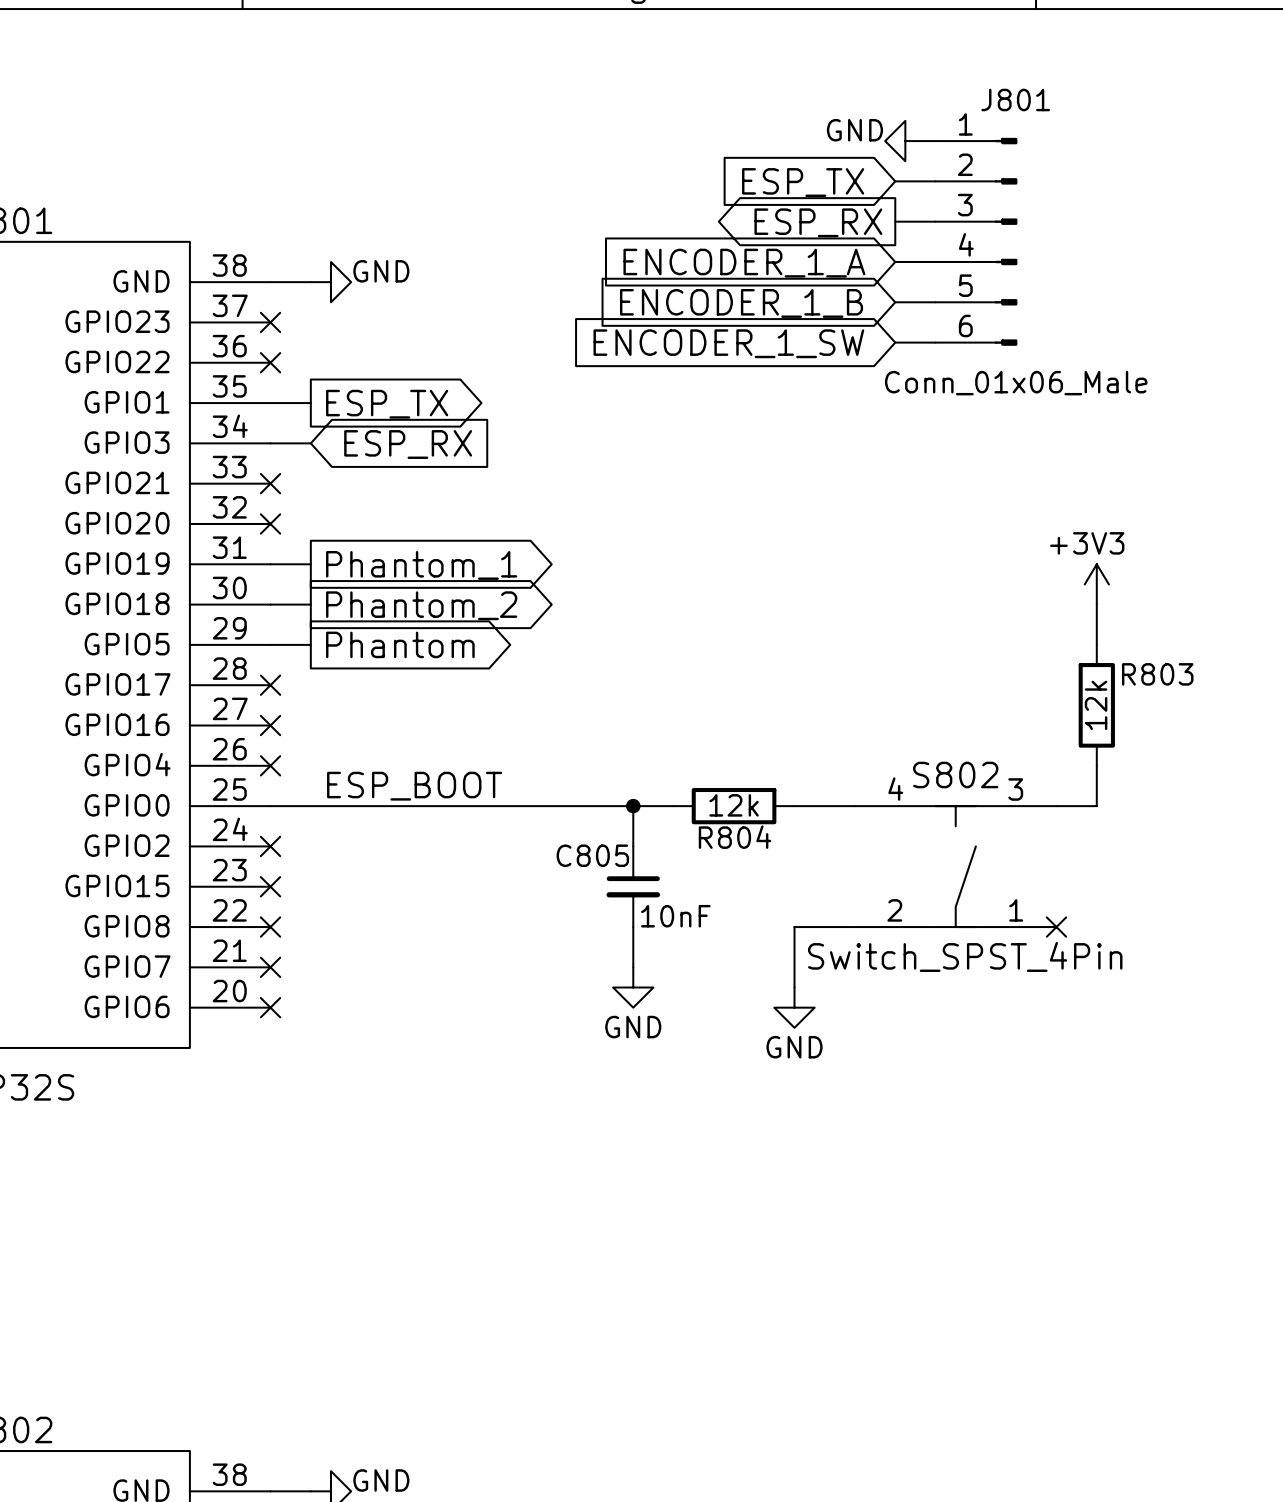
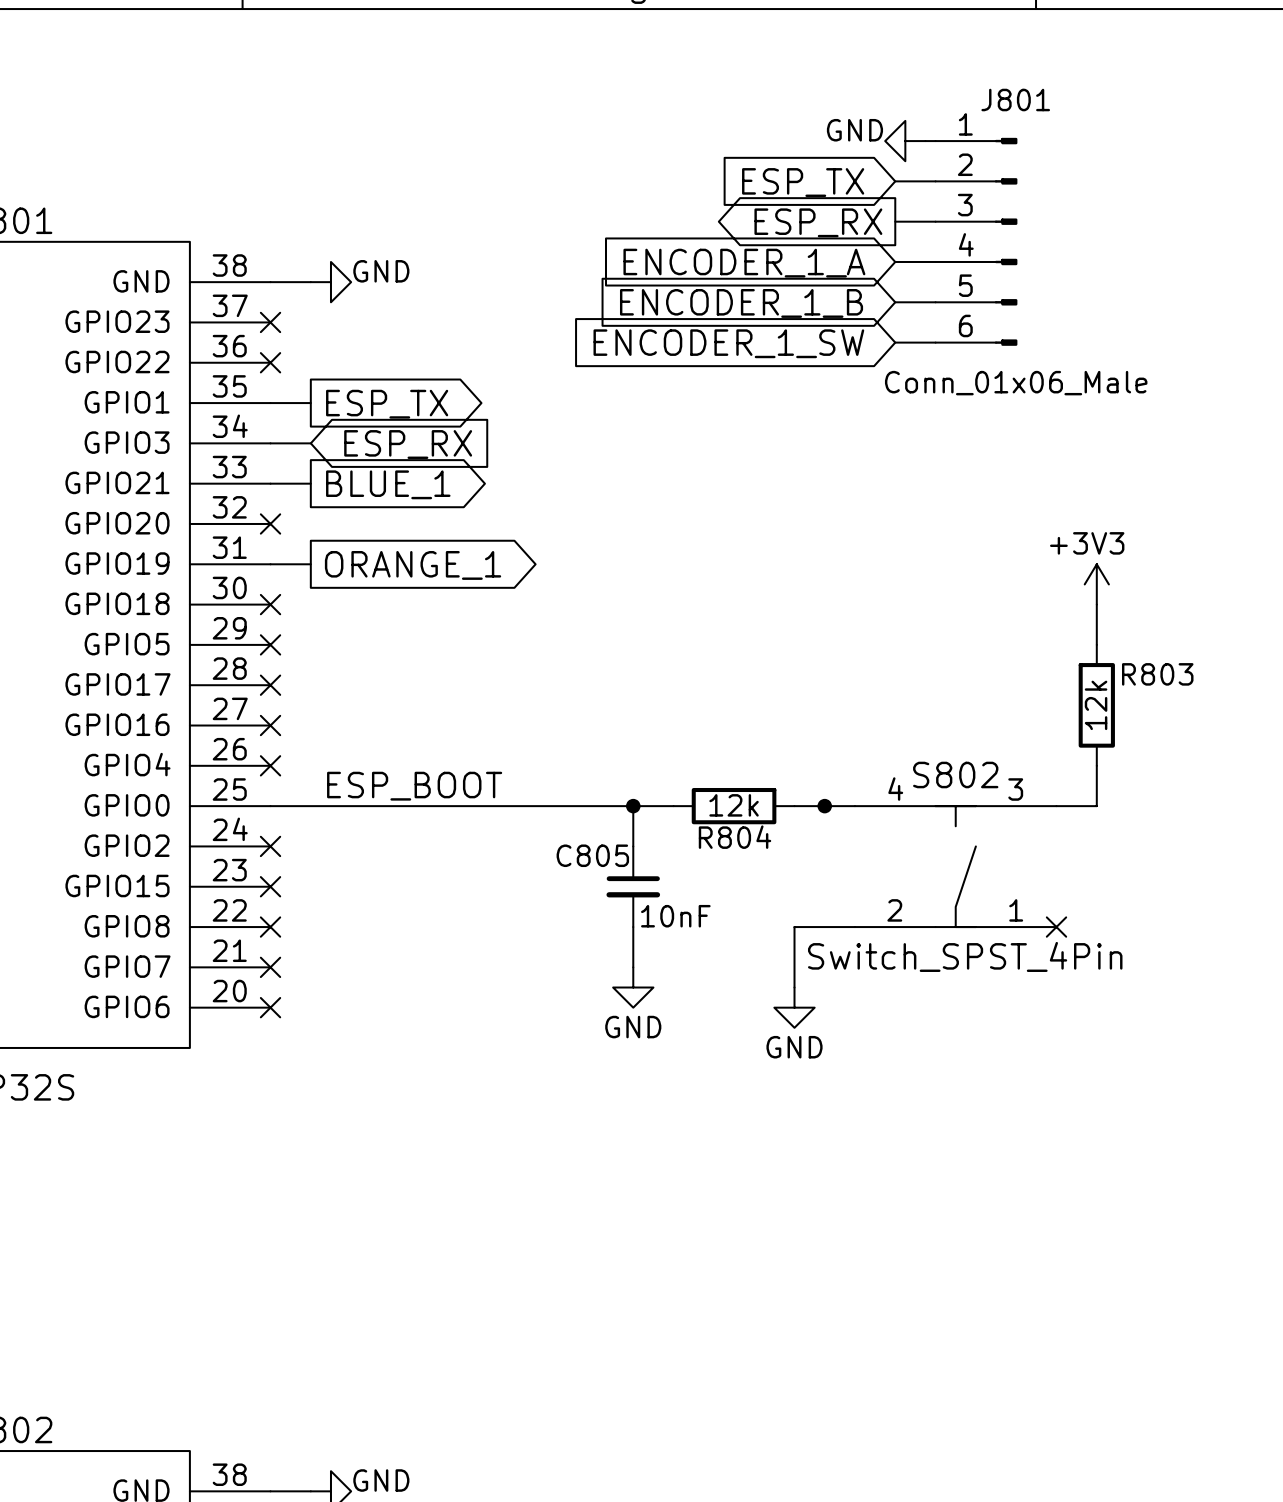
no-connect mark: (270, 483) -> none
global label: none -> BLUE_1 (388, 484)
global label: Phantom_1 (421, 565) -> ORANGE_1 (413, 565)
wire: (270, 604) (310, 604) -> (270, 483) (310, 483)
no-connect mark: none -> (270, 604)
global label: Phantom_2 (421, 605) -> none
wire: (270, 644) (310, 644) -> none
no-connect mark: none -> (270, 644)
global label: Phantom (400, 644) -> none
junction: none -> (824, 806)

